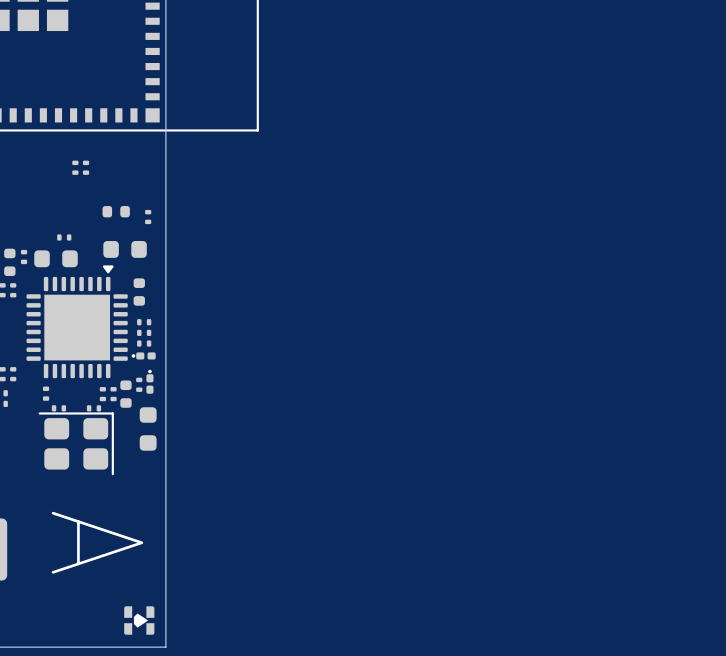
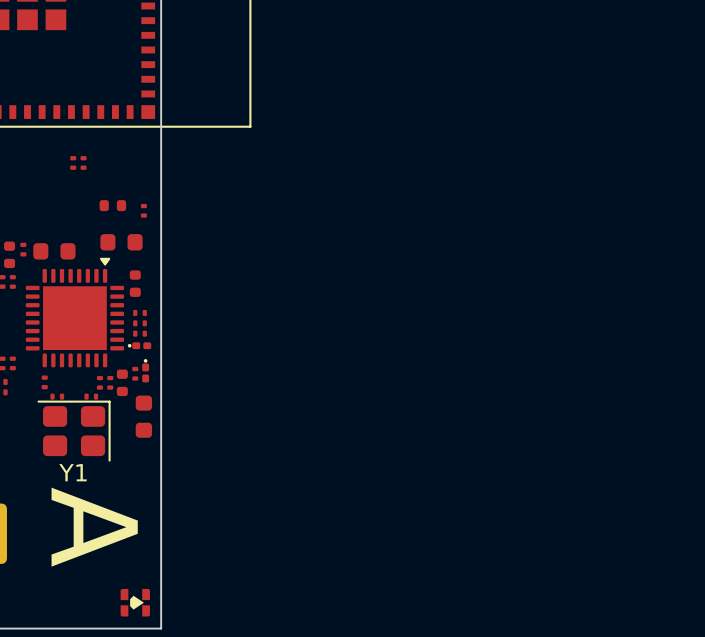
part: (64, 237) -> none
Y1 name: none -> Y1 (72, 472)

